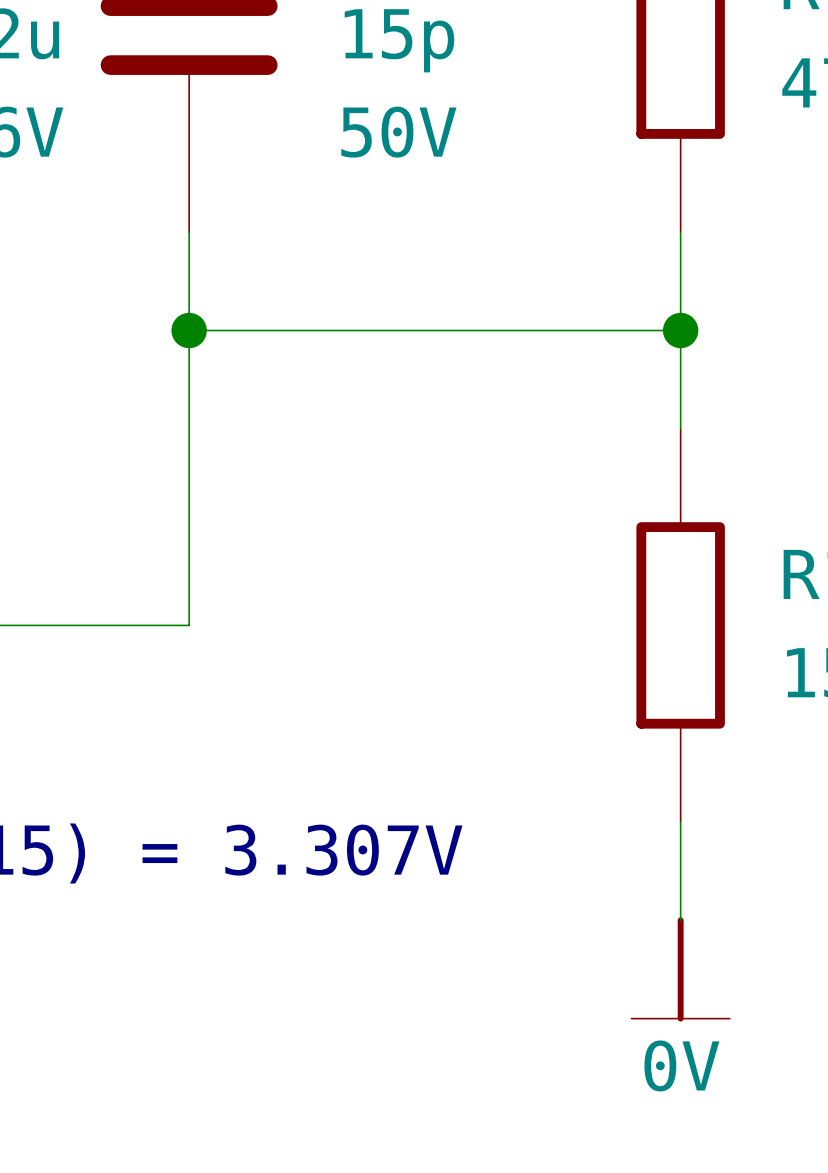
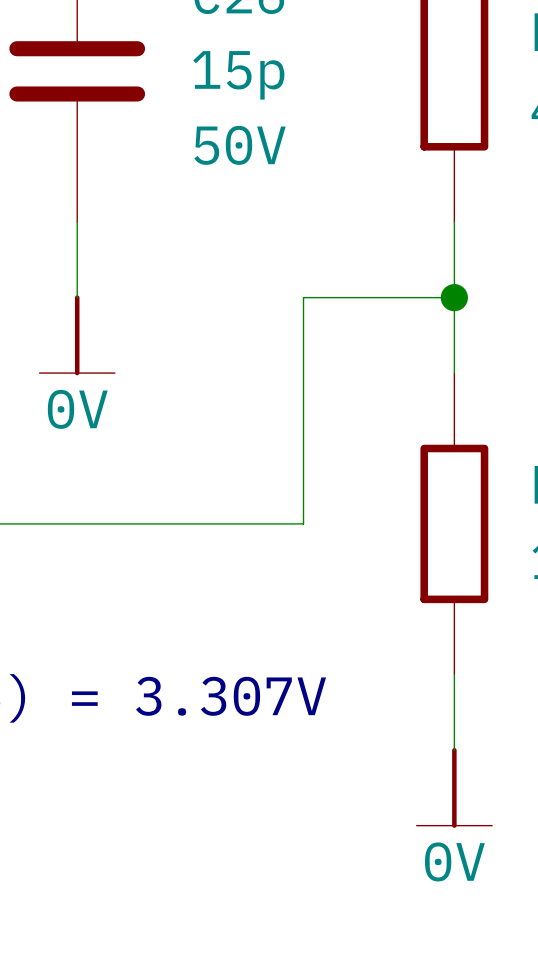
junction: (189, 330) -> none
wire: (484, 330) (189, 330) (189, 625) -> (303, 297) (303, 523) (77, 523)
power symbol: none -> 0V (77, 335)

